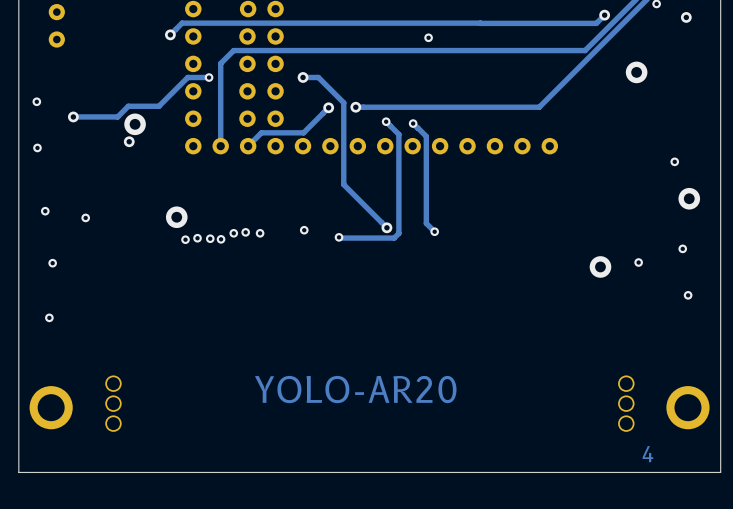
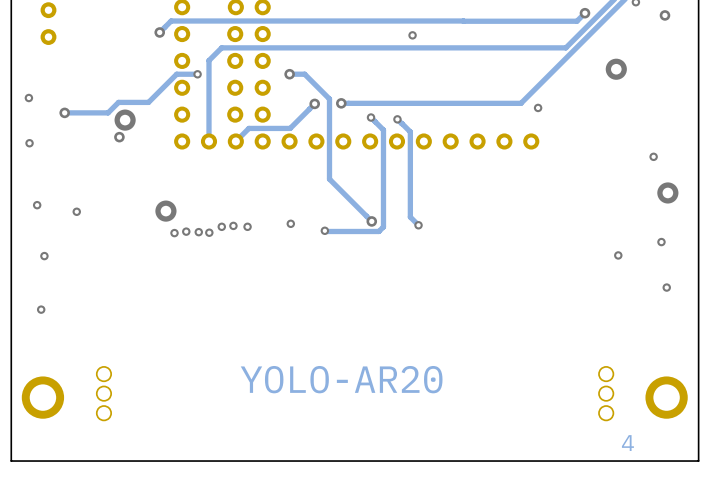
via: none -> (538, 107)
via: (600, 266) -> none

